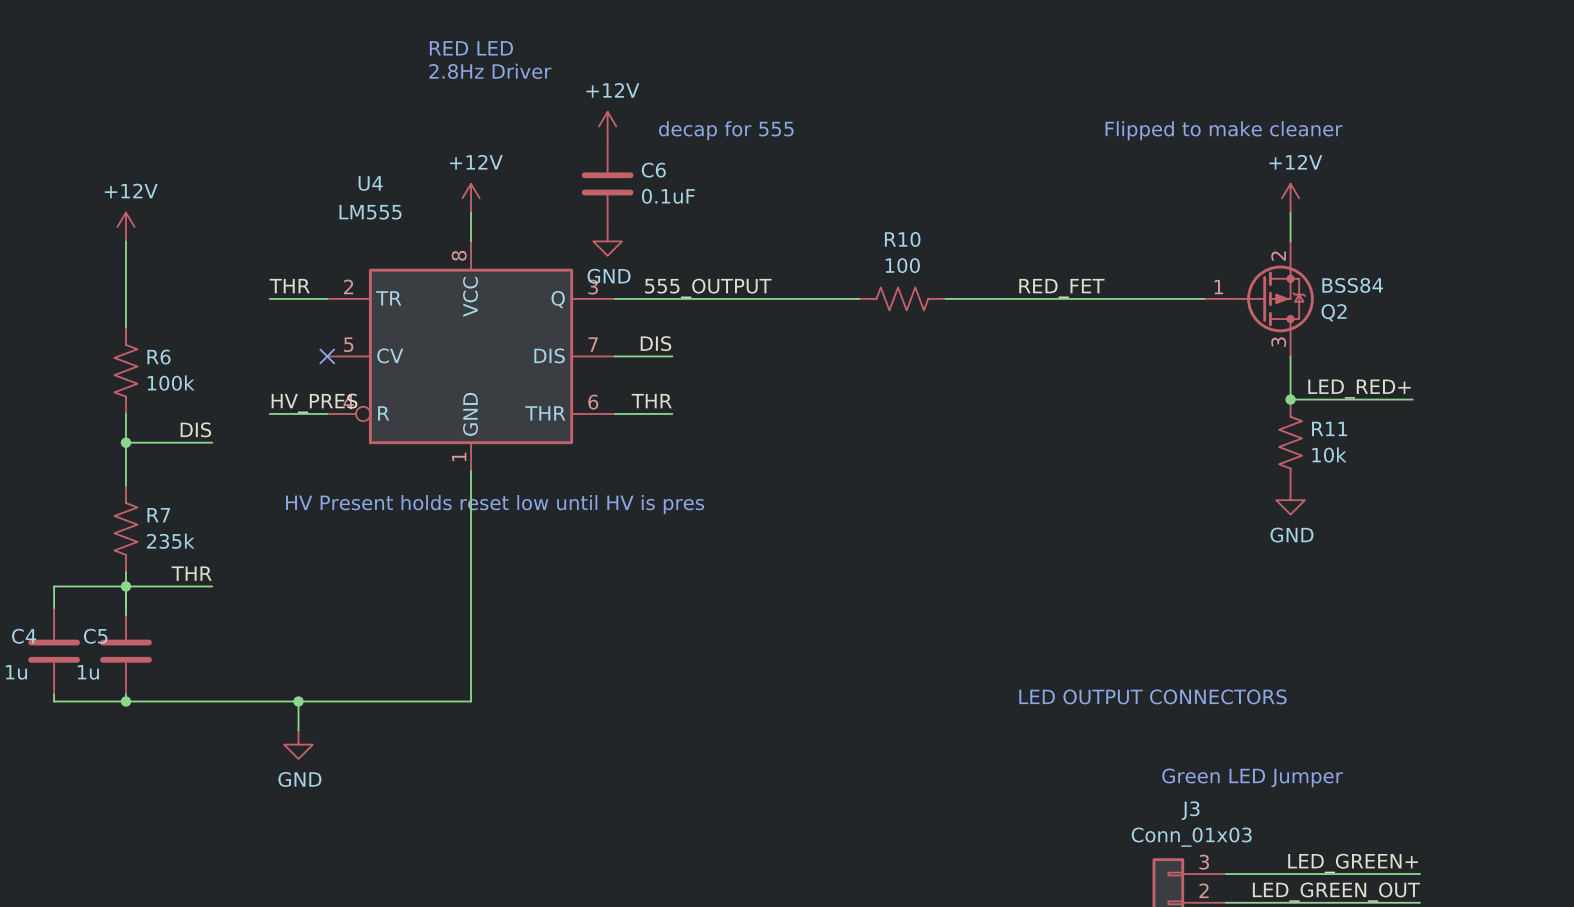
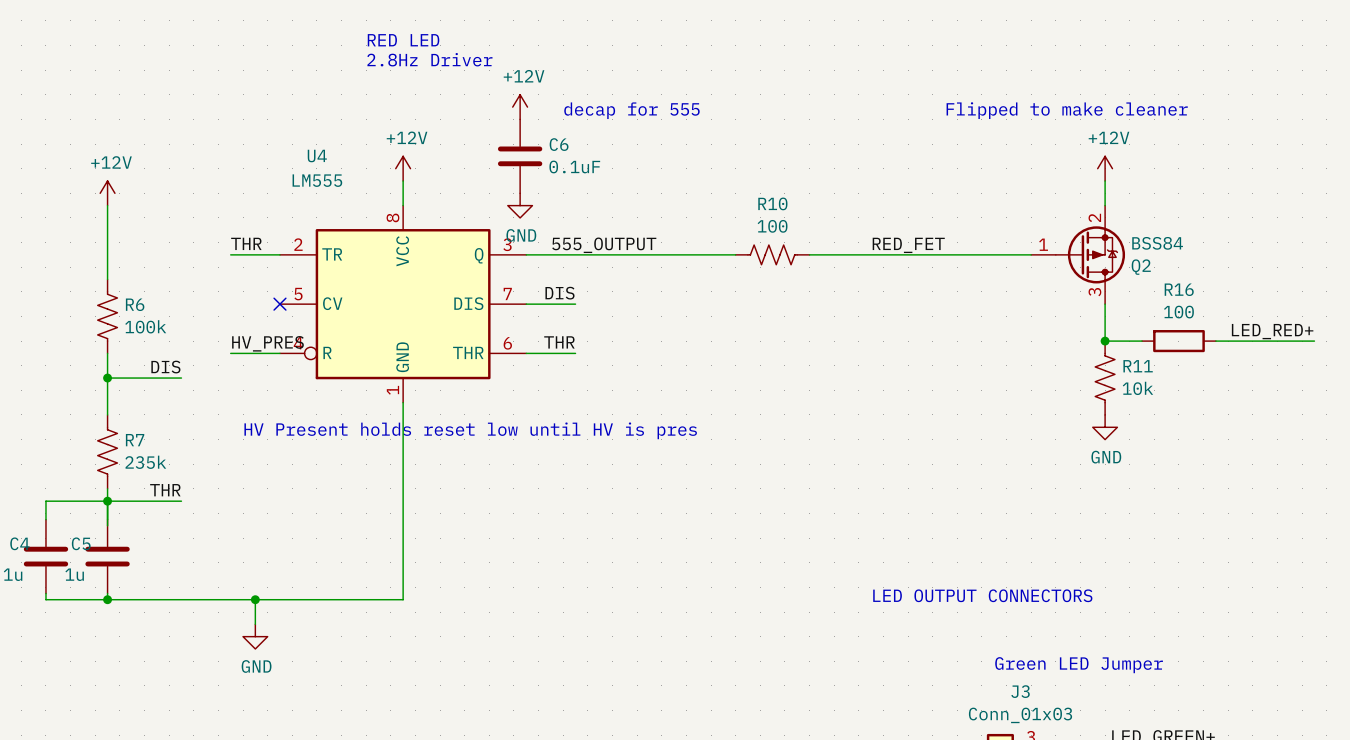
label position: LED_RED+ (1359, 389) -> LED_RED+ (1272, 331)
wire: (1333, 399) (1412, 399) -> none
R16: none -> 100 (1178, 341)
wire: none -> (1215, 341) (1314, 341)

